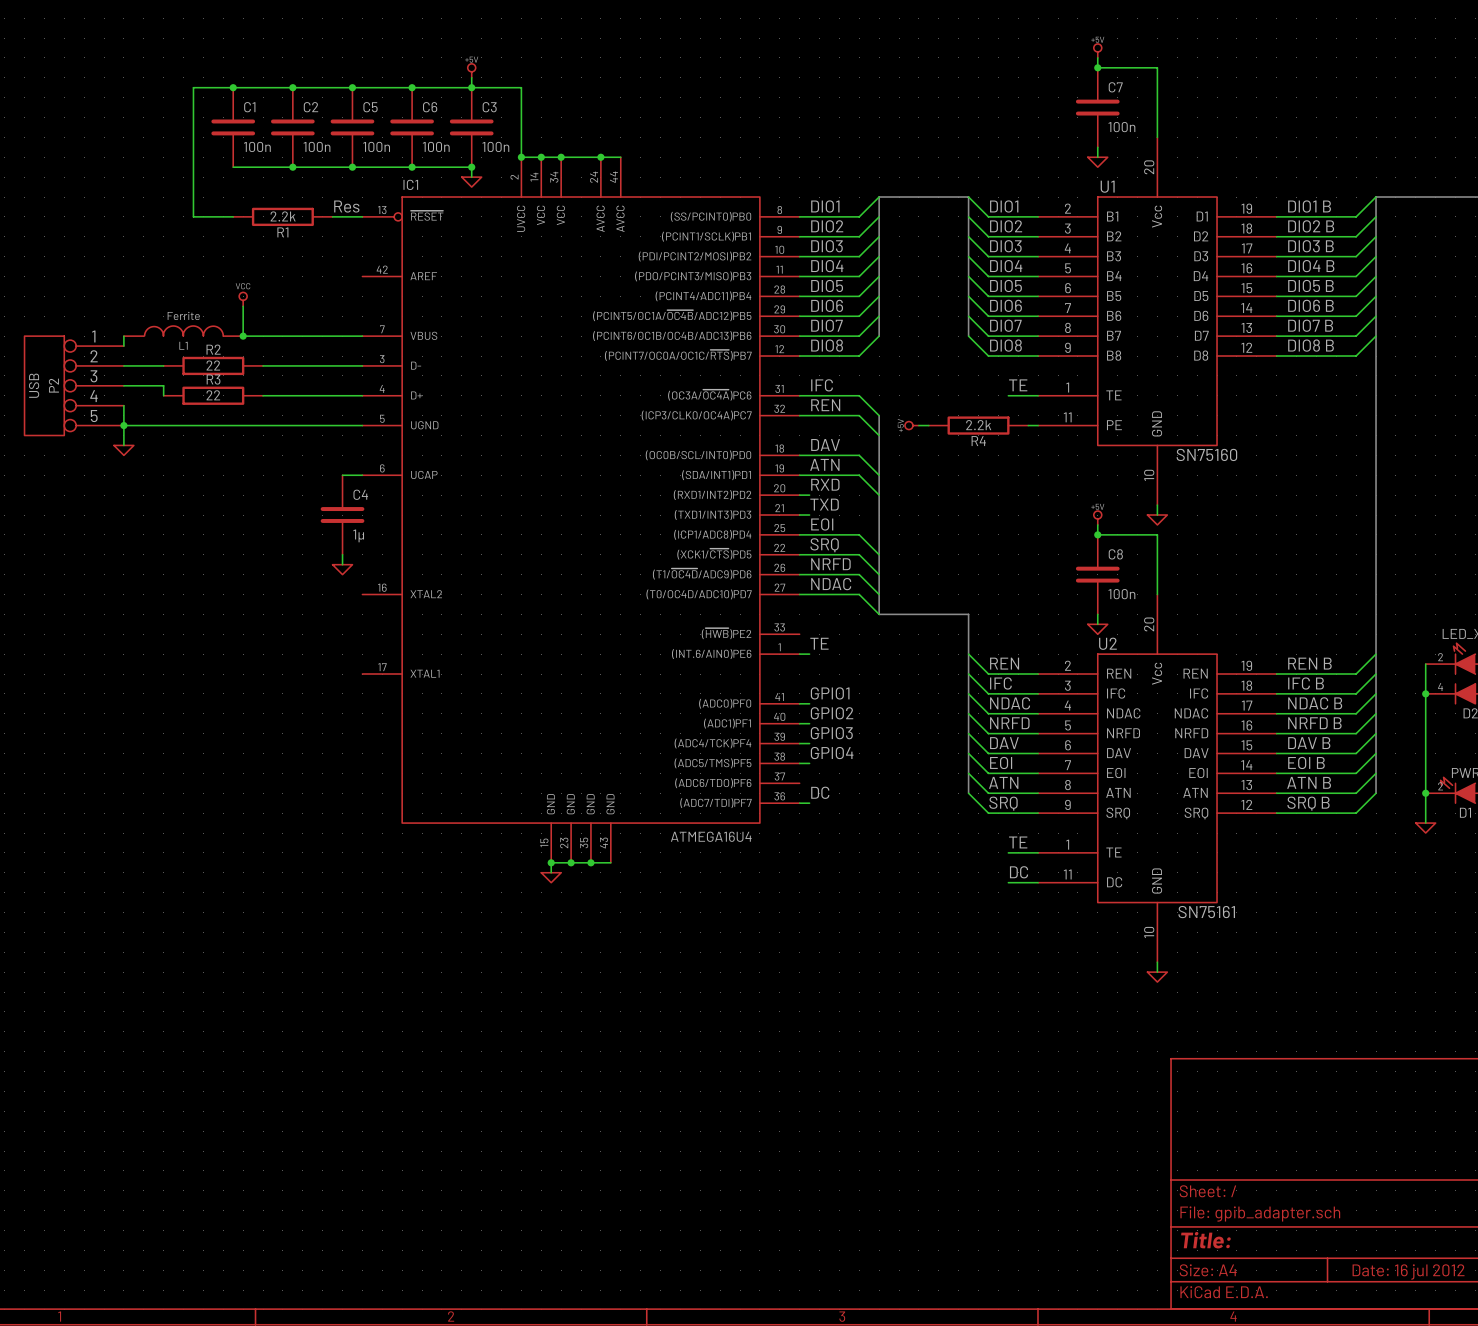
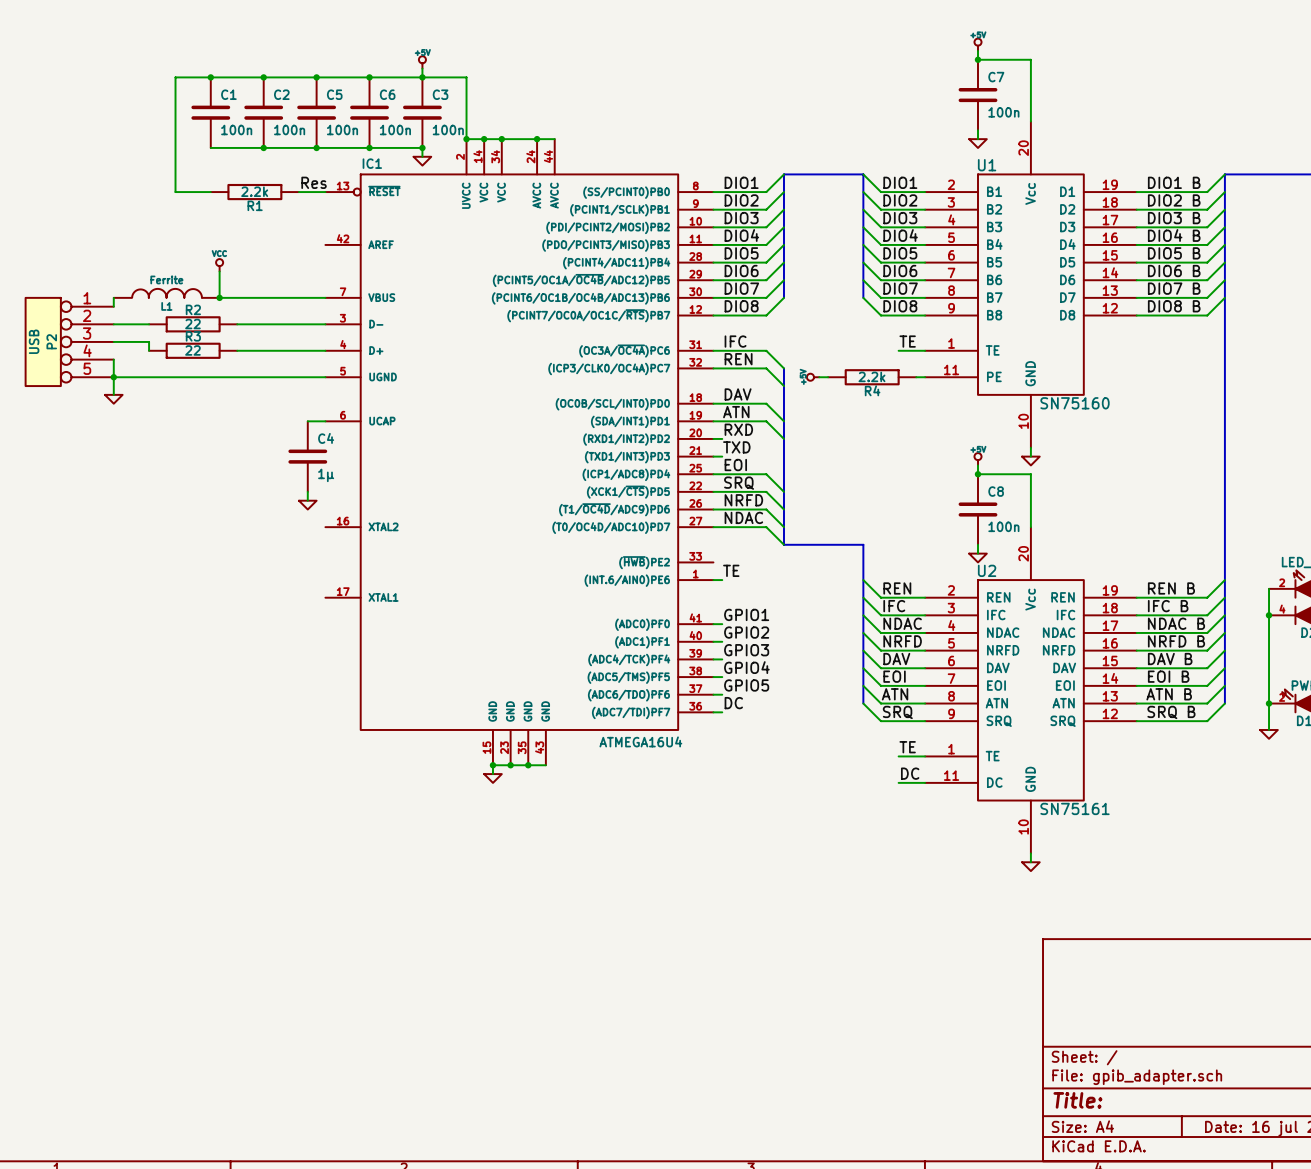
label: none -> GPIO5 (746, 685)
wire: none -> (713, 694) (722, 694)

